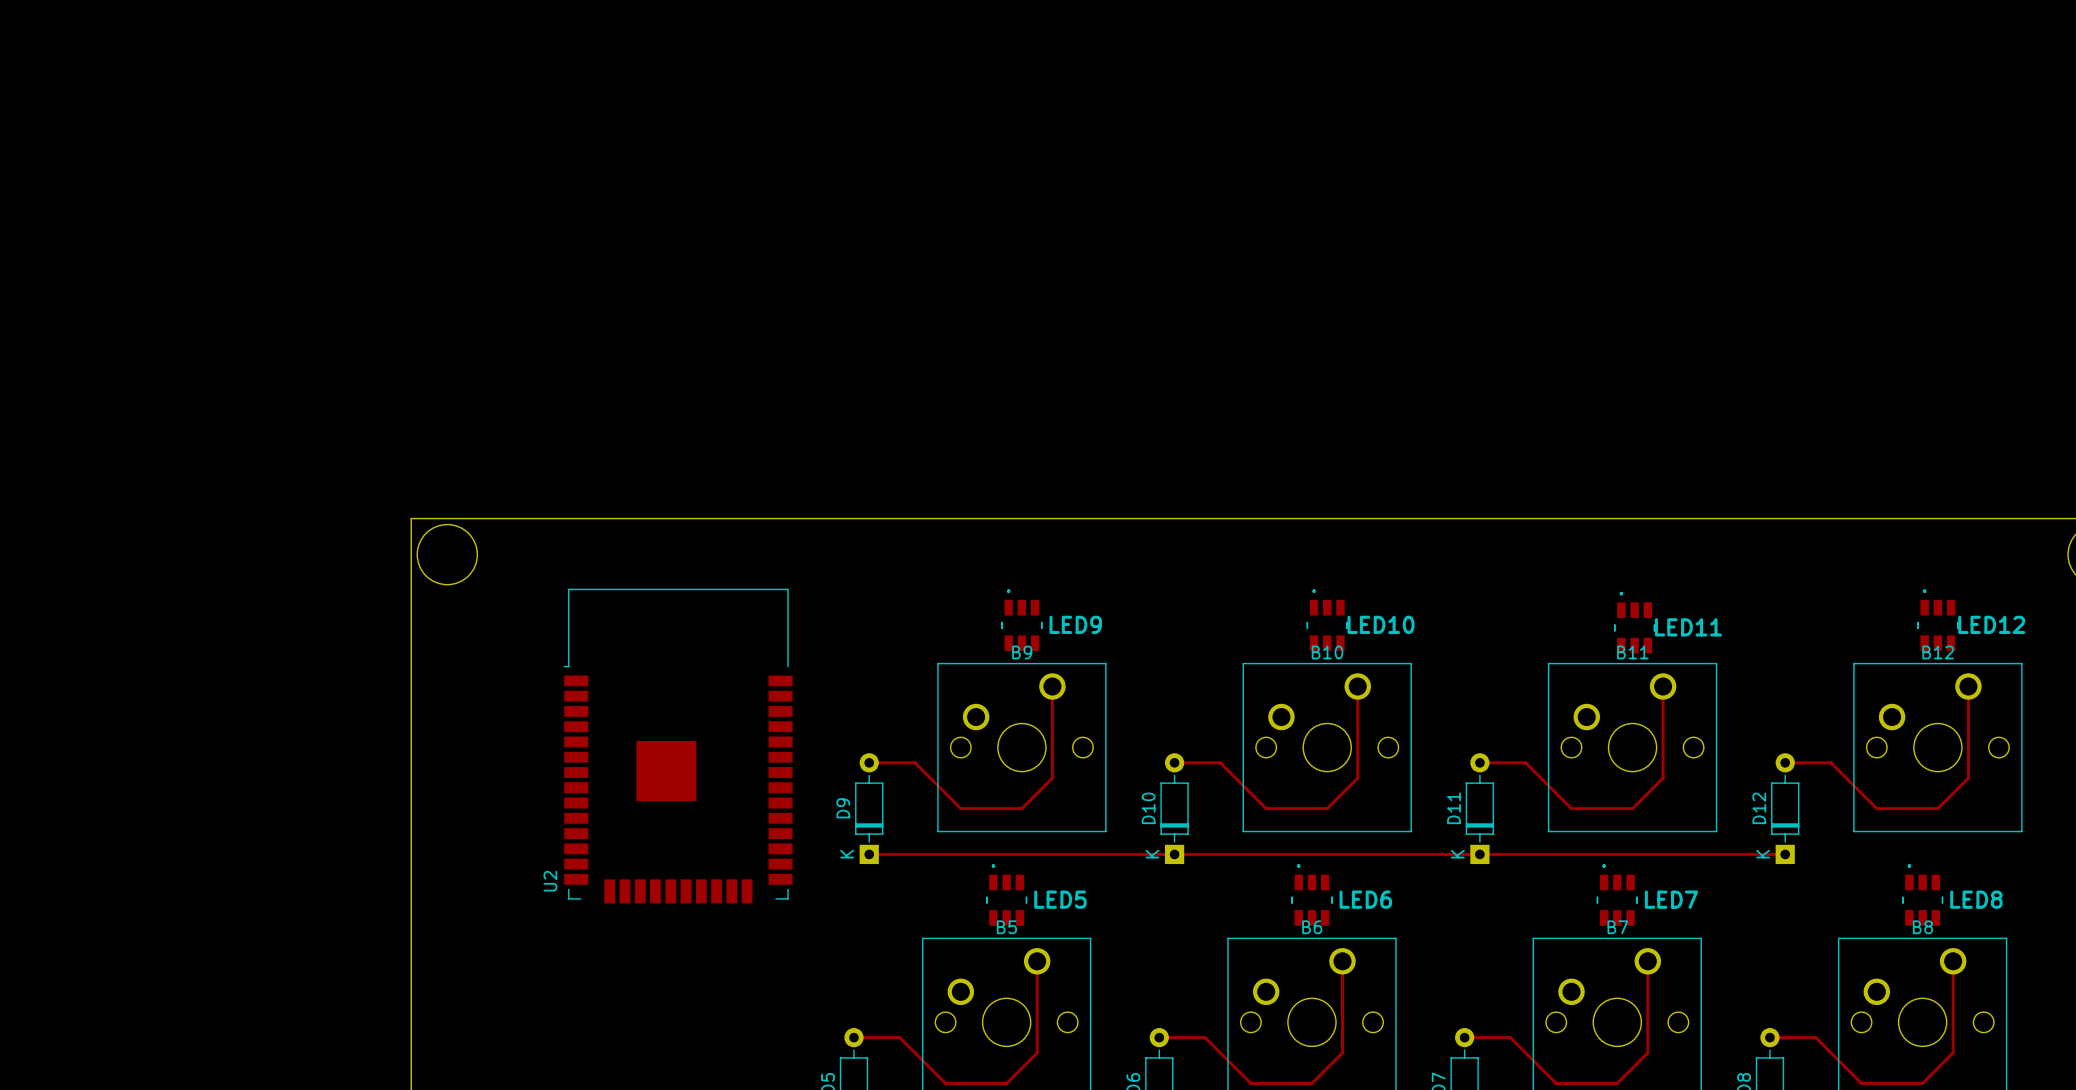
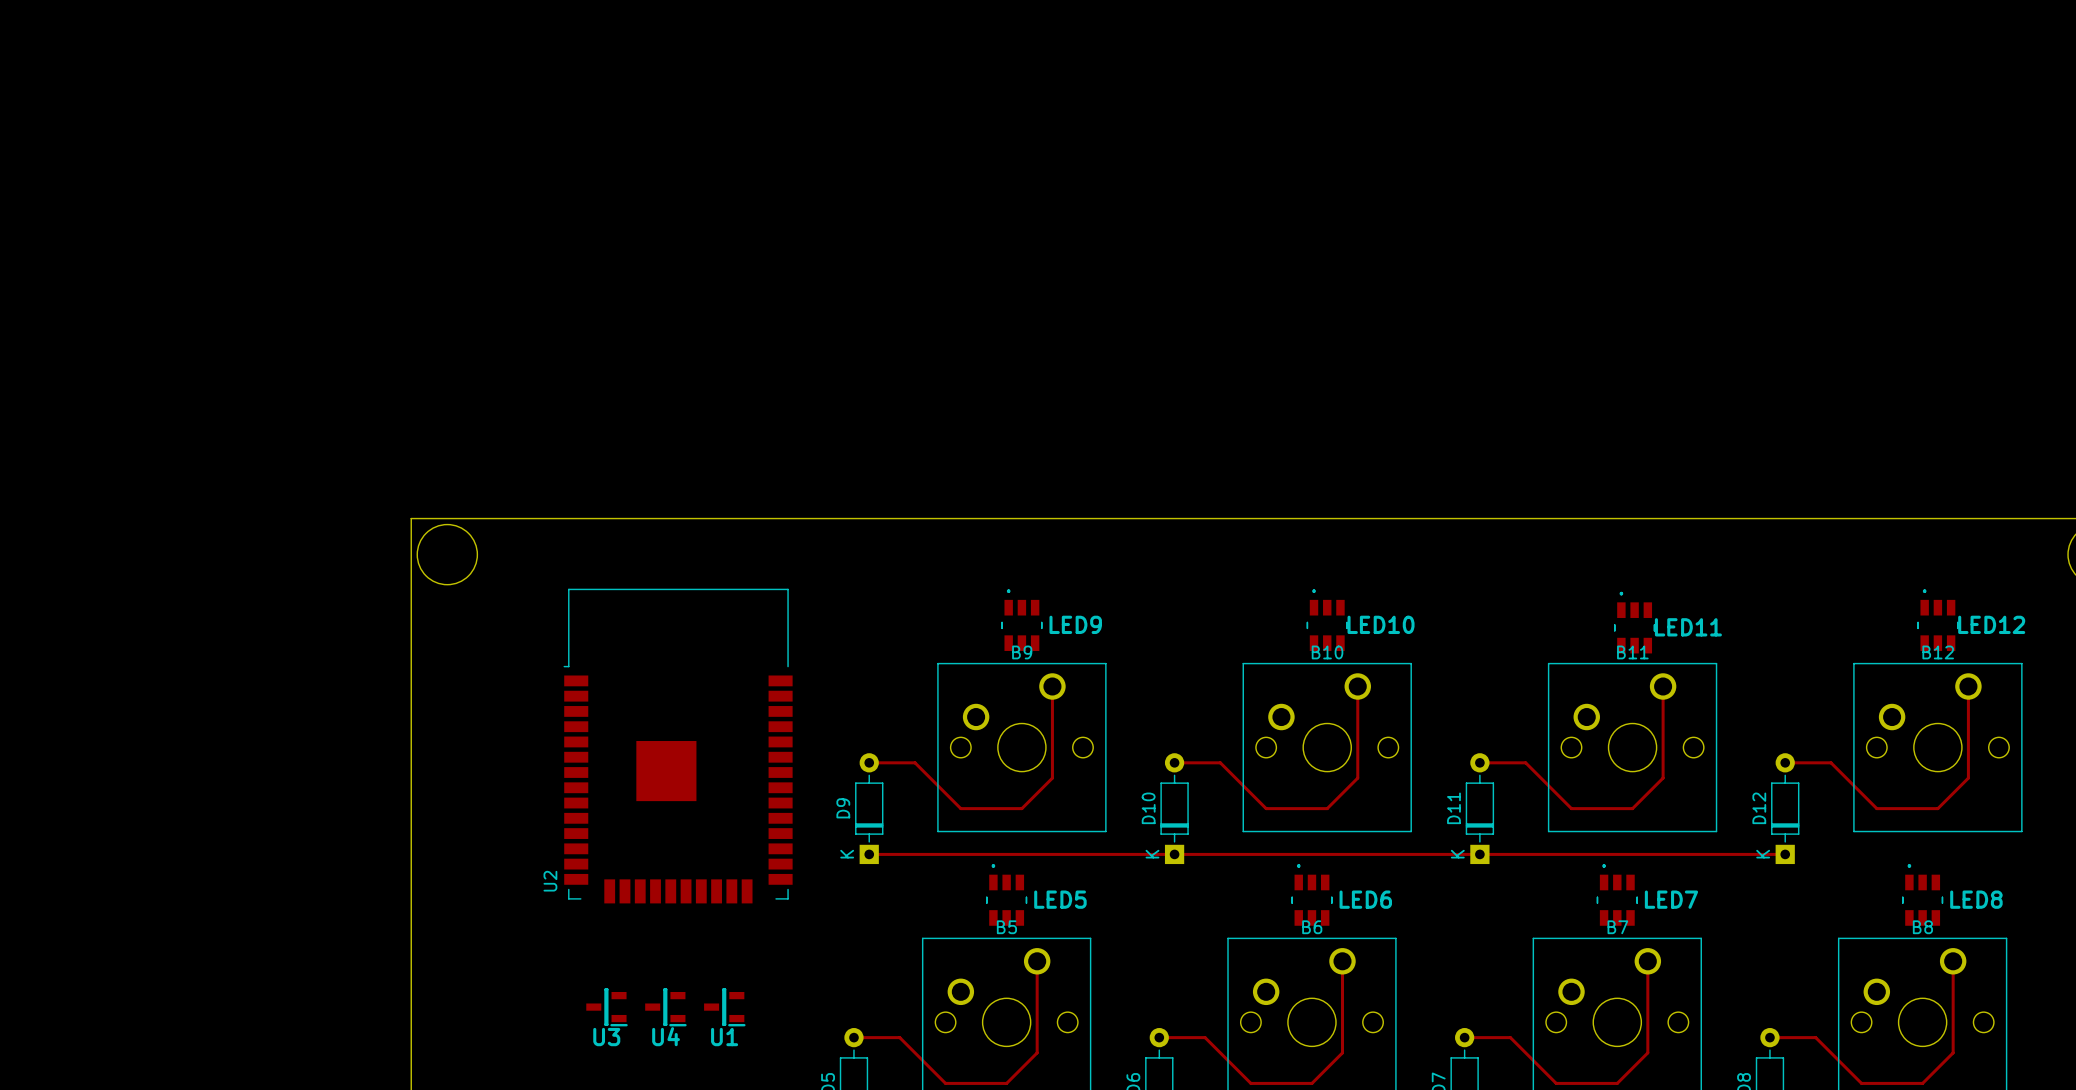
U3: none -> (607, 1007)
U4: none -> (665, 1007)
U1: none -> (724, 1007)

